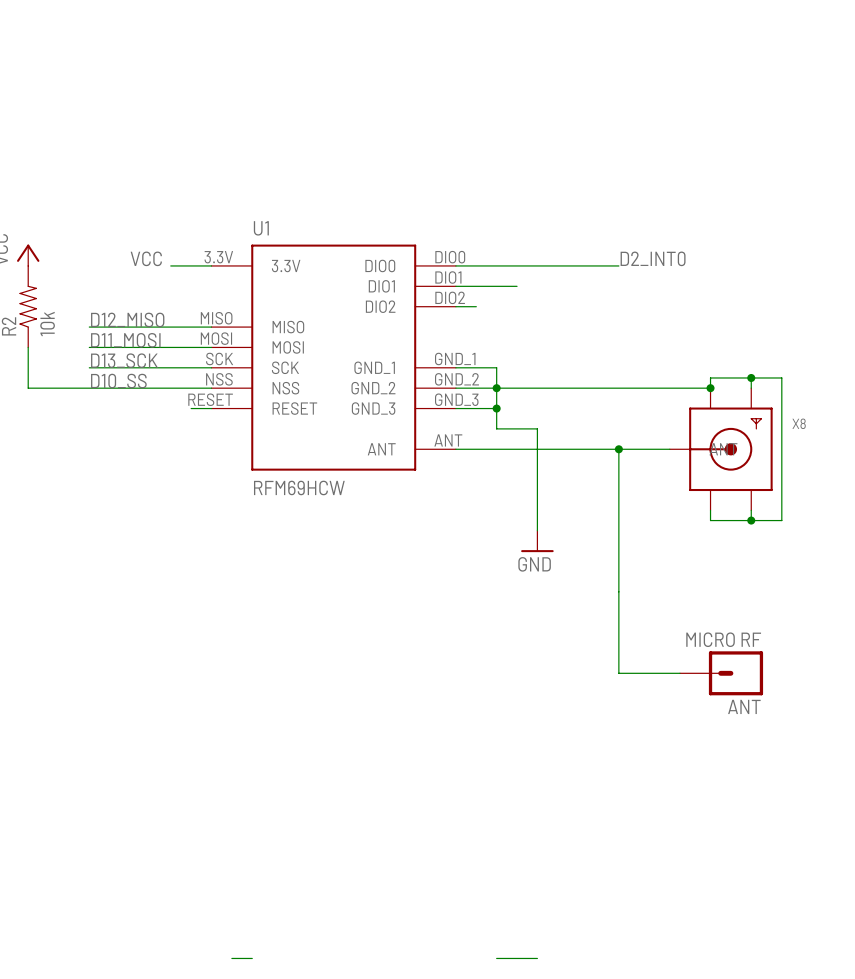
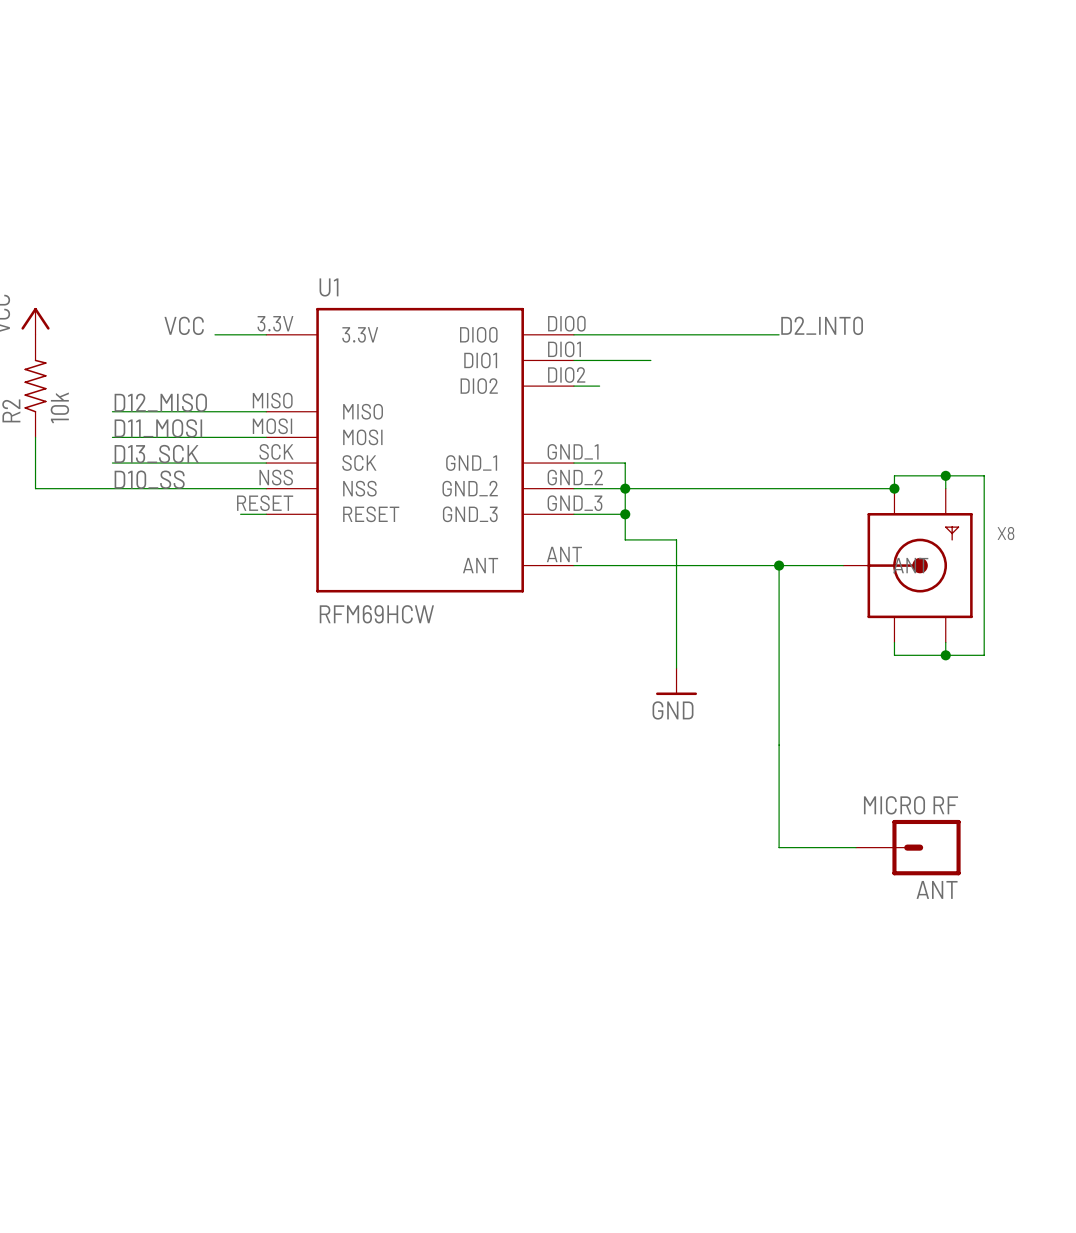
wire: (231, 958) (252, 958) -> none
wire: (496, 958) (537, 958) -> none

